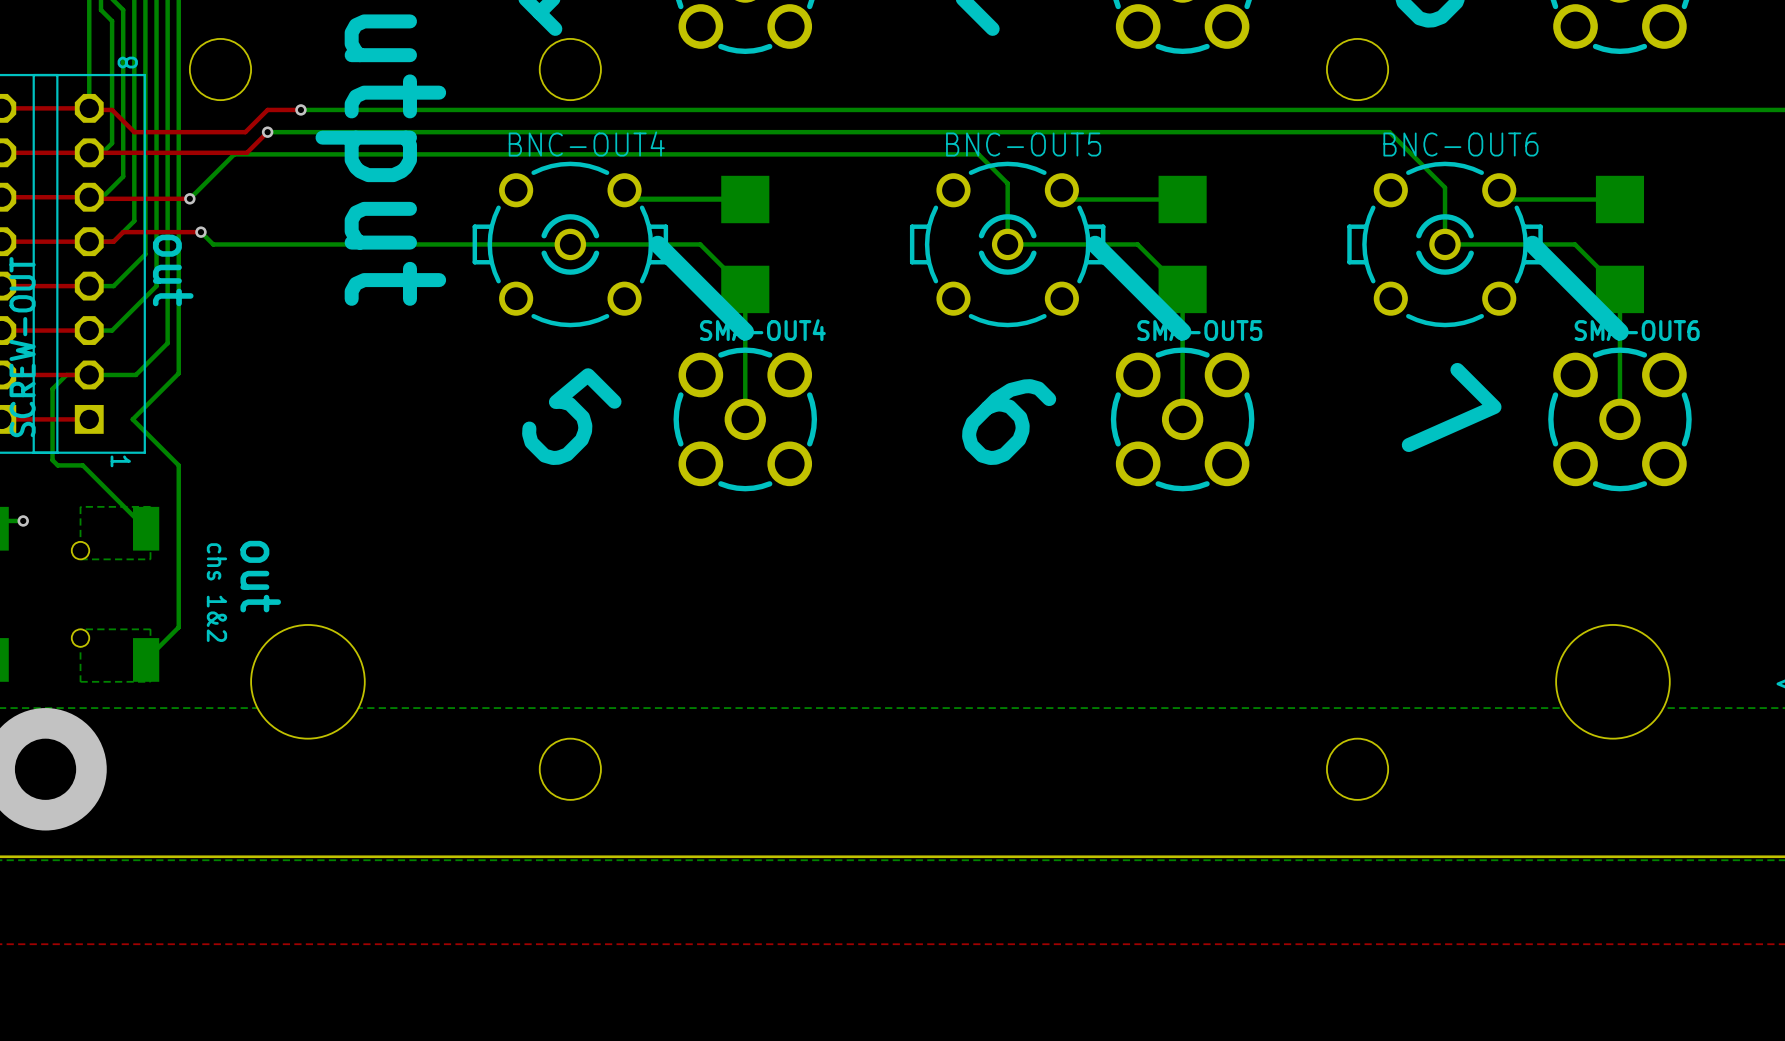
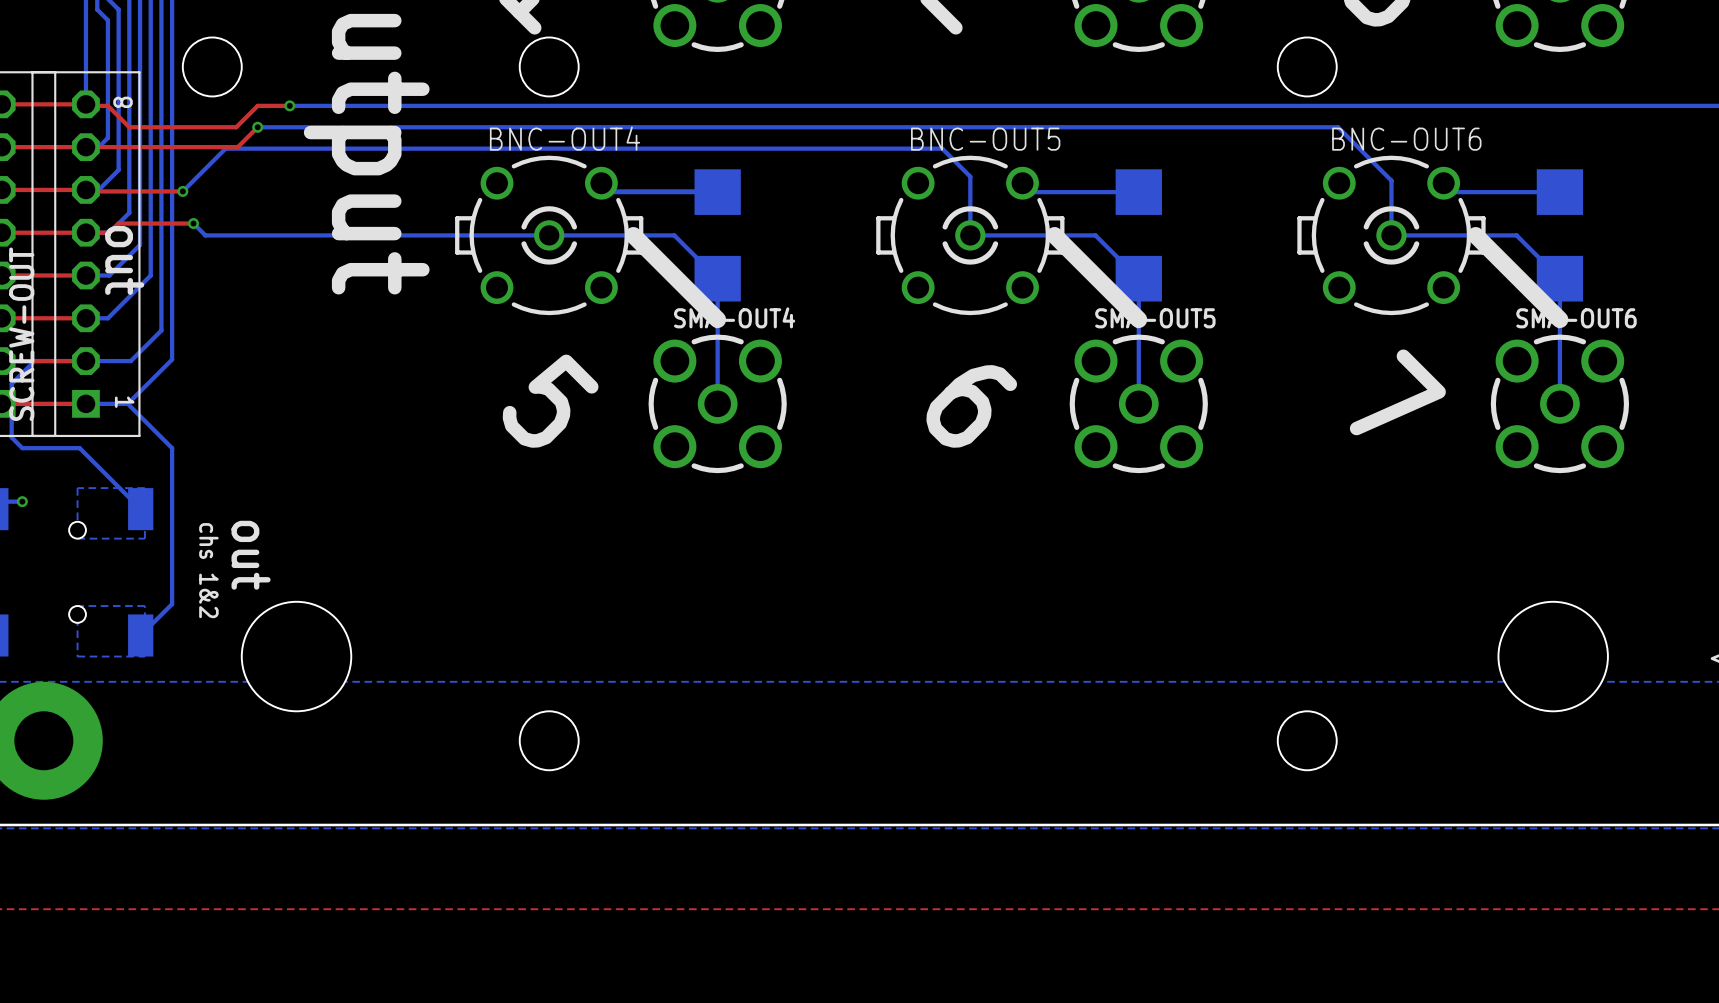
text position: 8 (127, 62) -> 8 (123, 102)
text position: out (173, 270) -> out (124, 260)
bottom track: (66, 374) (52, 388) (52, 460) (57, 465) -> (64, 361) (34, 361) (11, 383) (11, 437) (22, 448) (55, 448)
bottom track: none -> (85, 403) (127, 403)
text position: 1 (120, 461) -> 1 (124, 402)

